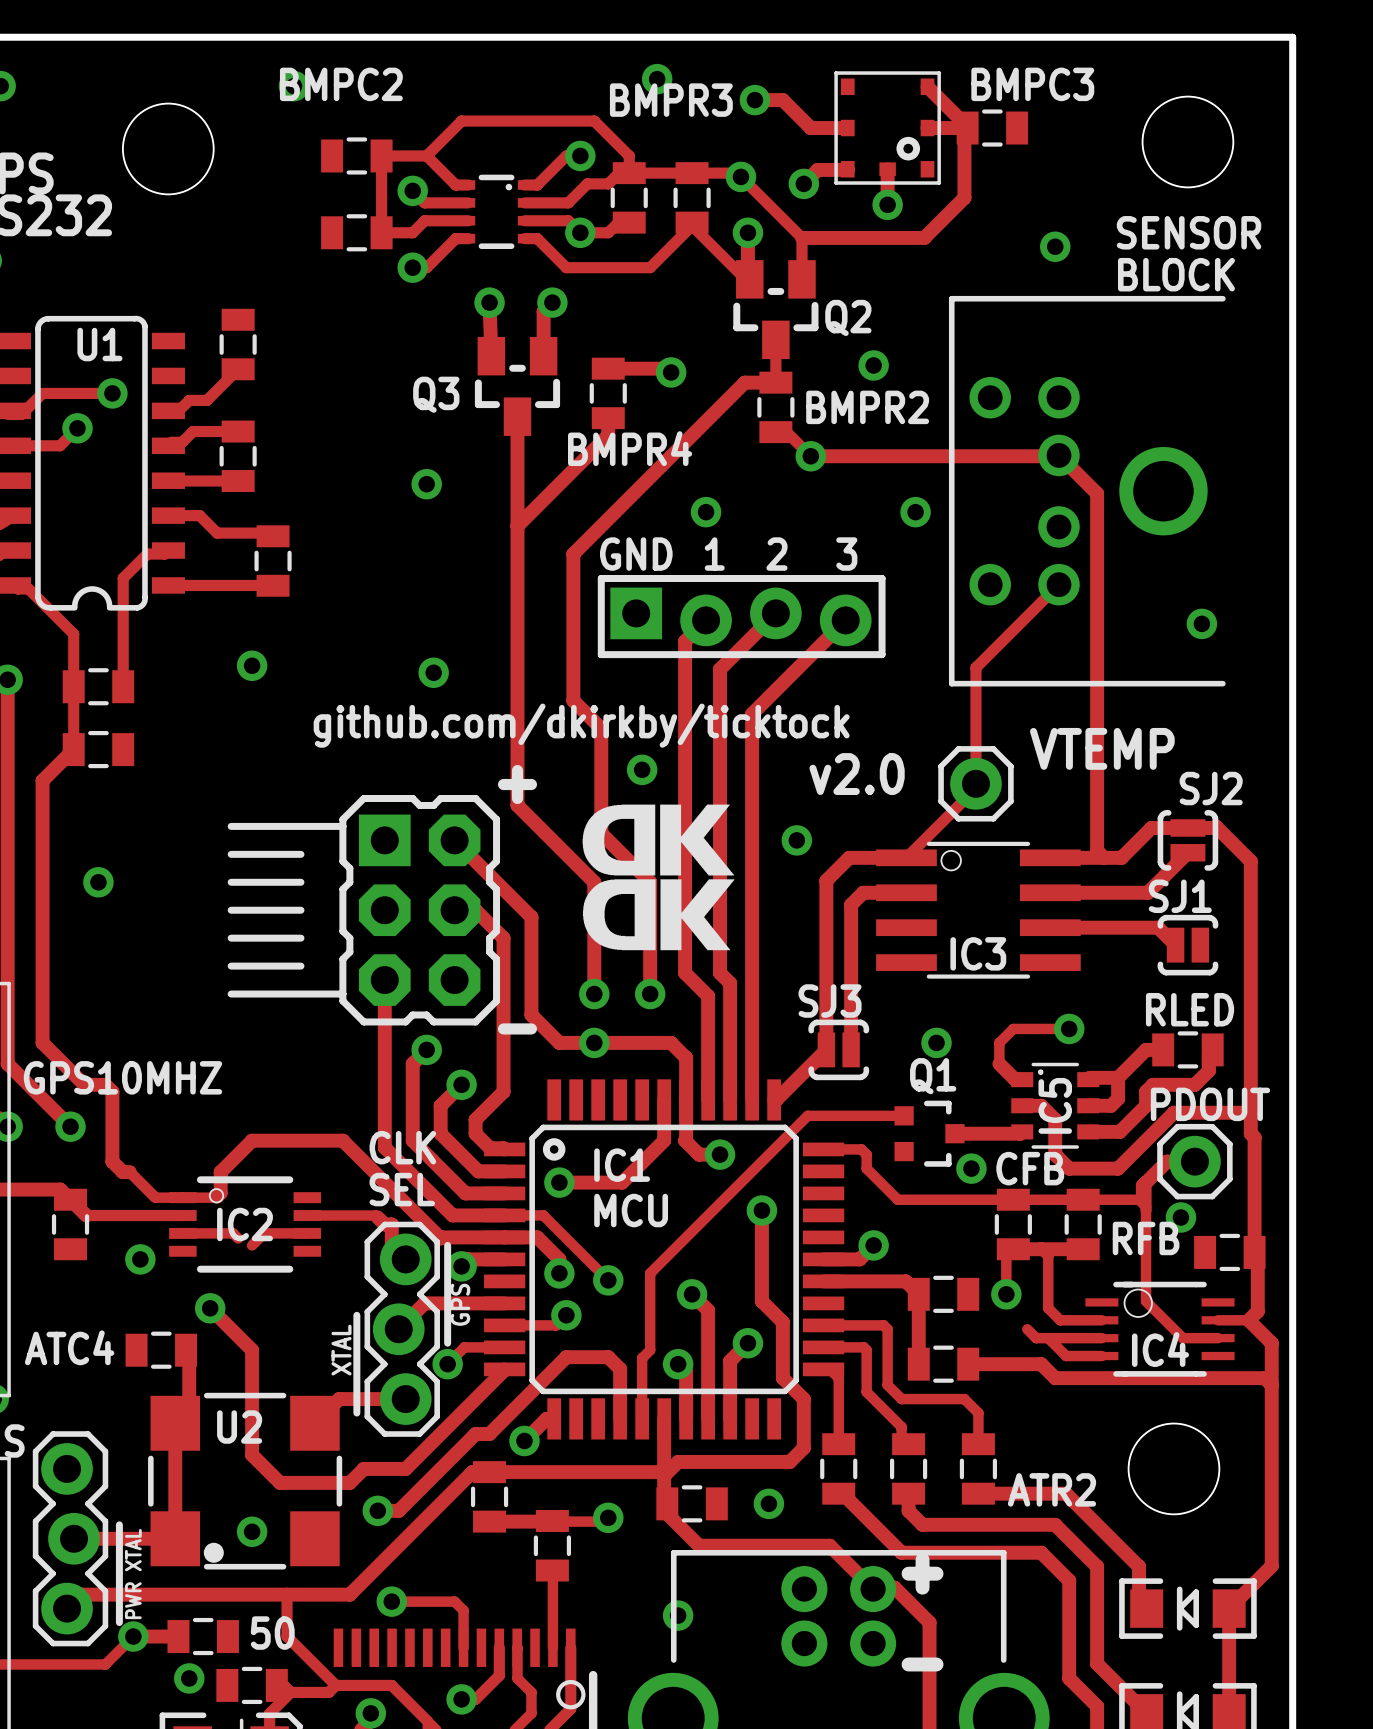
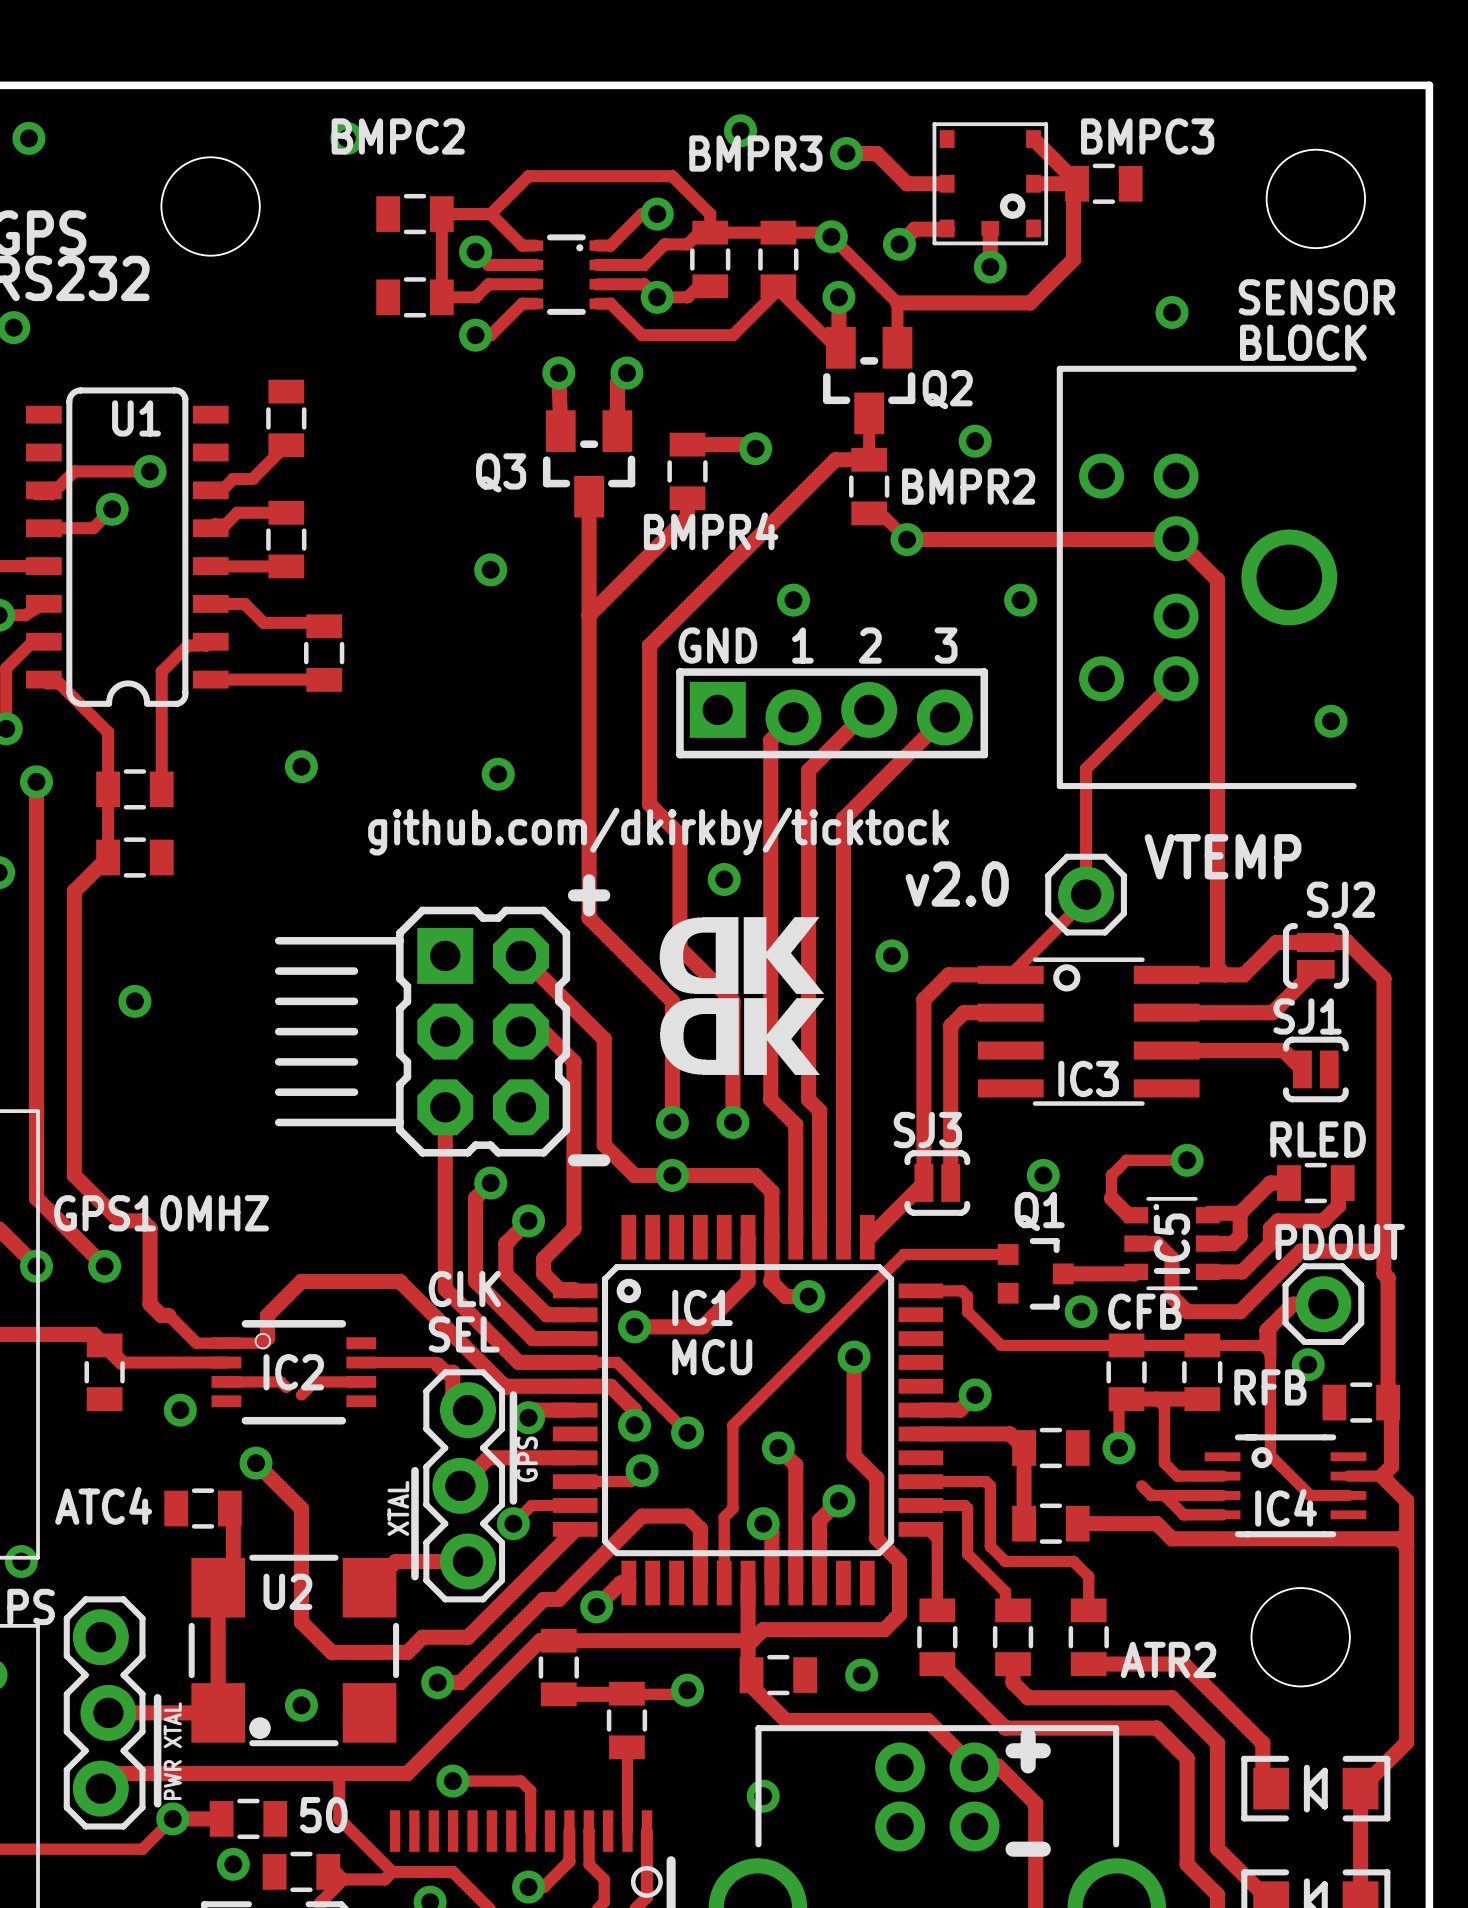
IC3 footprint: [876, 841, 1081, 979] -> [977, 957, 1200, 1106]
IC4 footprint: [1085, 1281, 1235, 1377] -> [1204, 1434, 1367, 1538]

